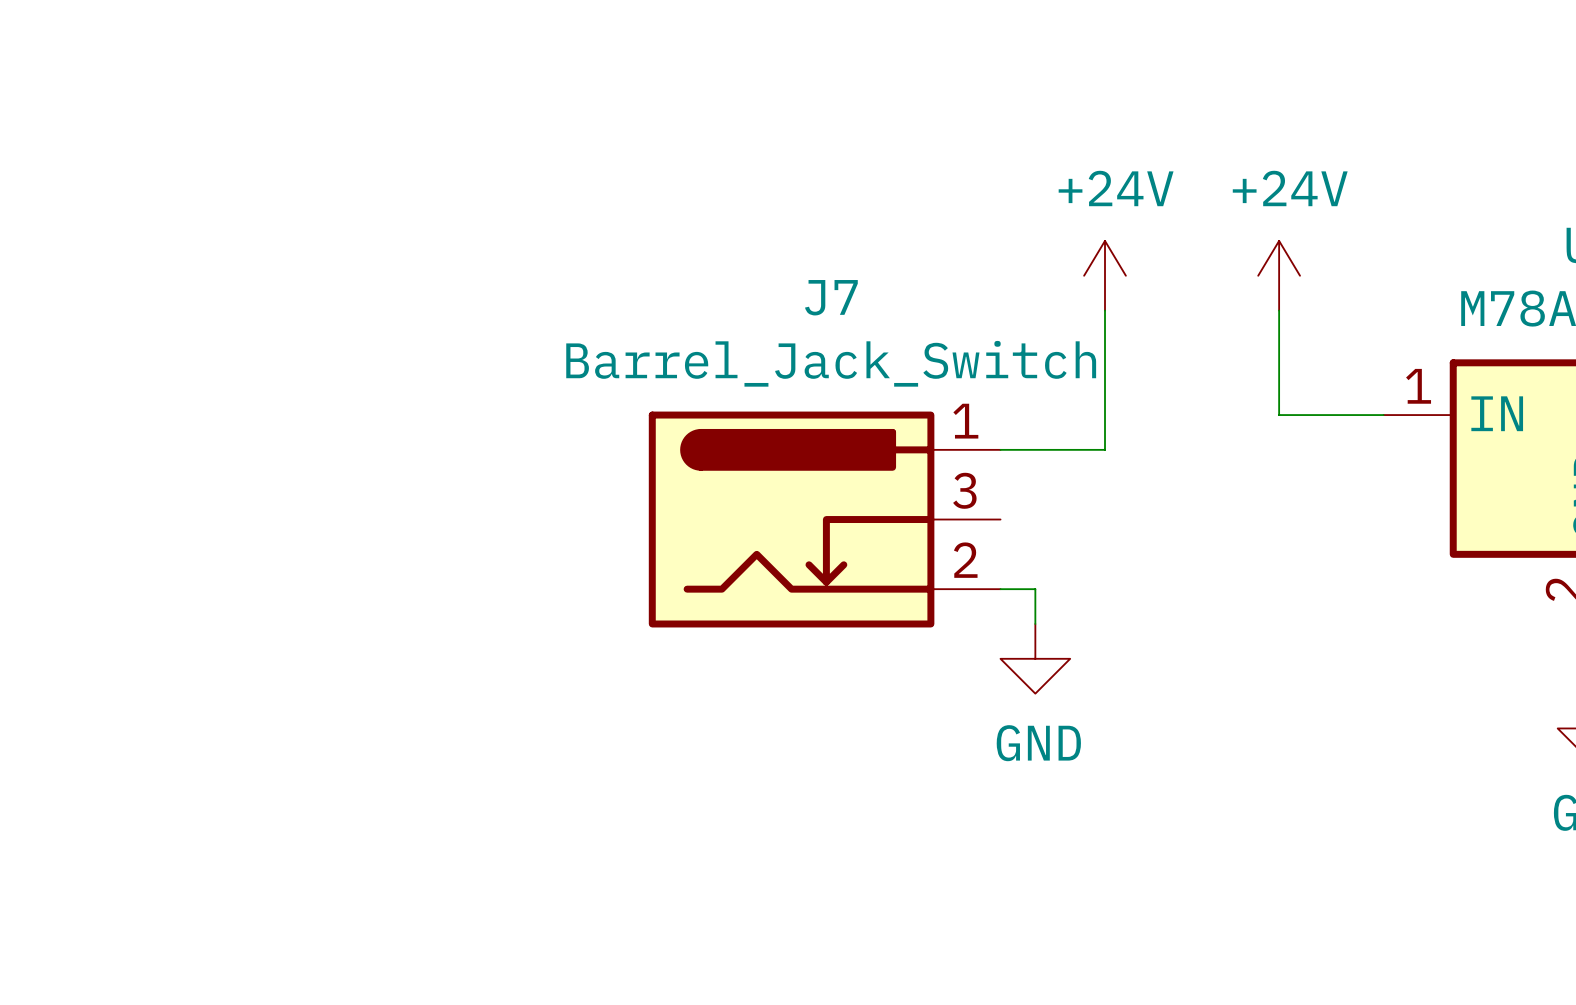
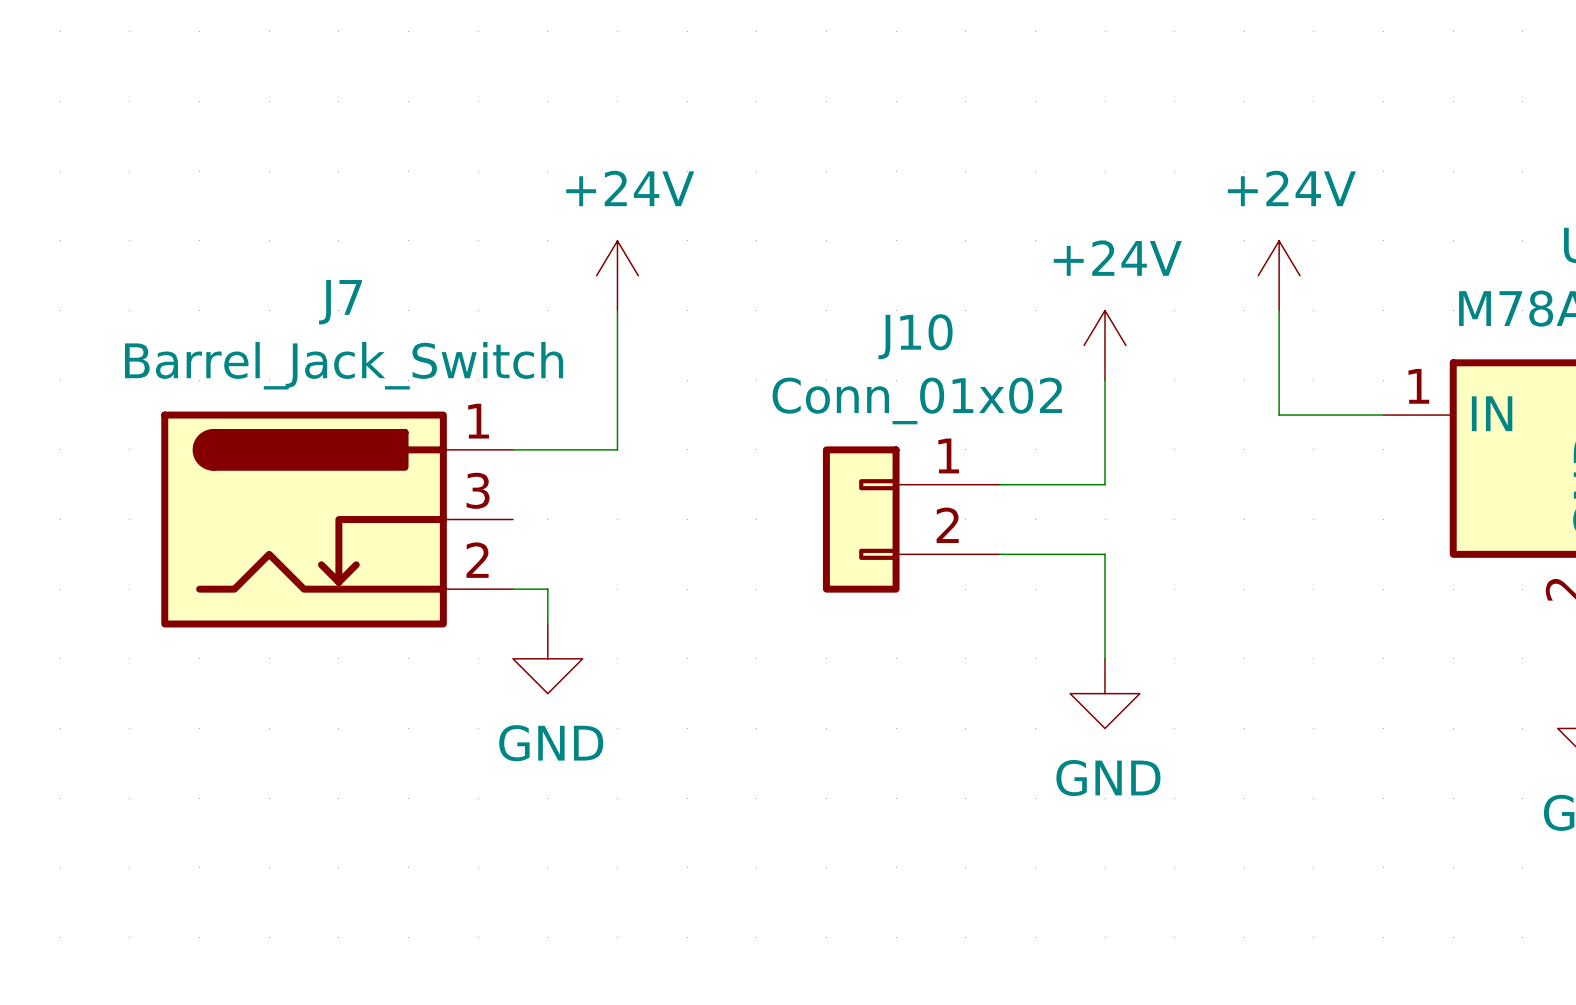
power symbol: none -> +24V (617, 275)
power symbol position: +24V (1105, 275) -> +24V (1105, 345)
wire: none -> (617, 310) (617, 449) (513, 449)
wire: (1000, 449) (1105, 449) -> (1000, 484) (1105, 484) (1105, 449)
J7 position: (824, 519) -> (337, 519)
J10: none -> Conn_01x02 (911, 519)
wire: none -> (1000, 554) (1105, 554) (1105, 658)
wire: (1000, 589) (1035, 589) (1035, 623) -> (513, 589) (547, 589) (547, 623)
power symbol: none -> GND (547, 658)
power symbol position: GND (1035, 658) -> GND (1105, 693)

